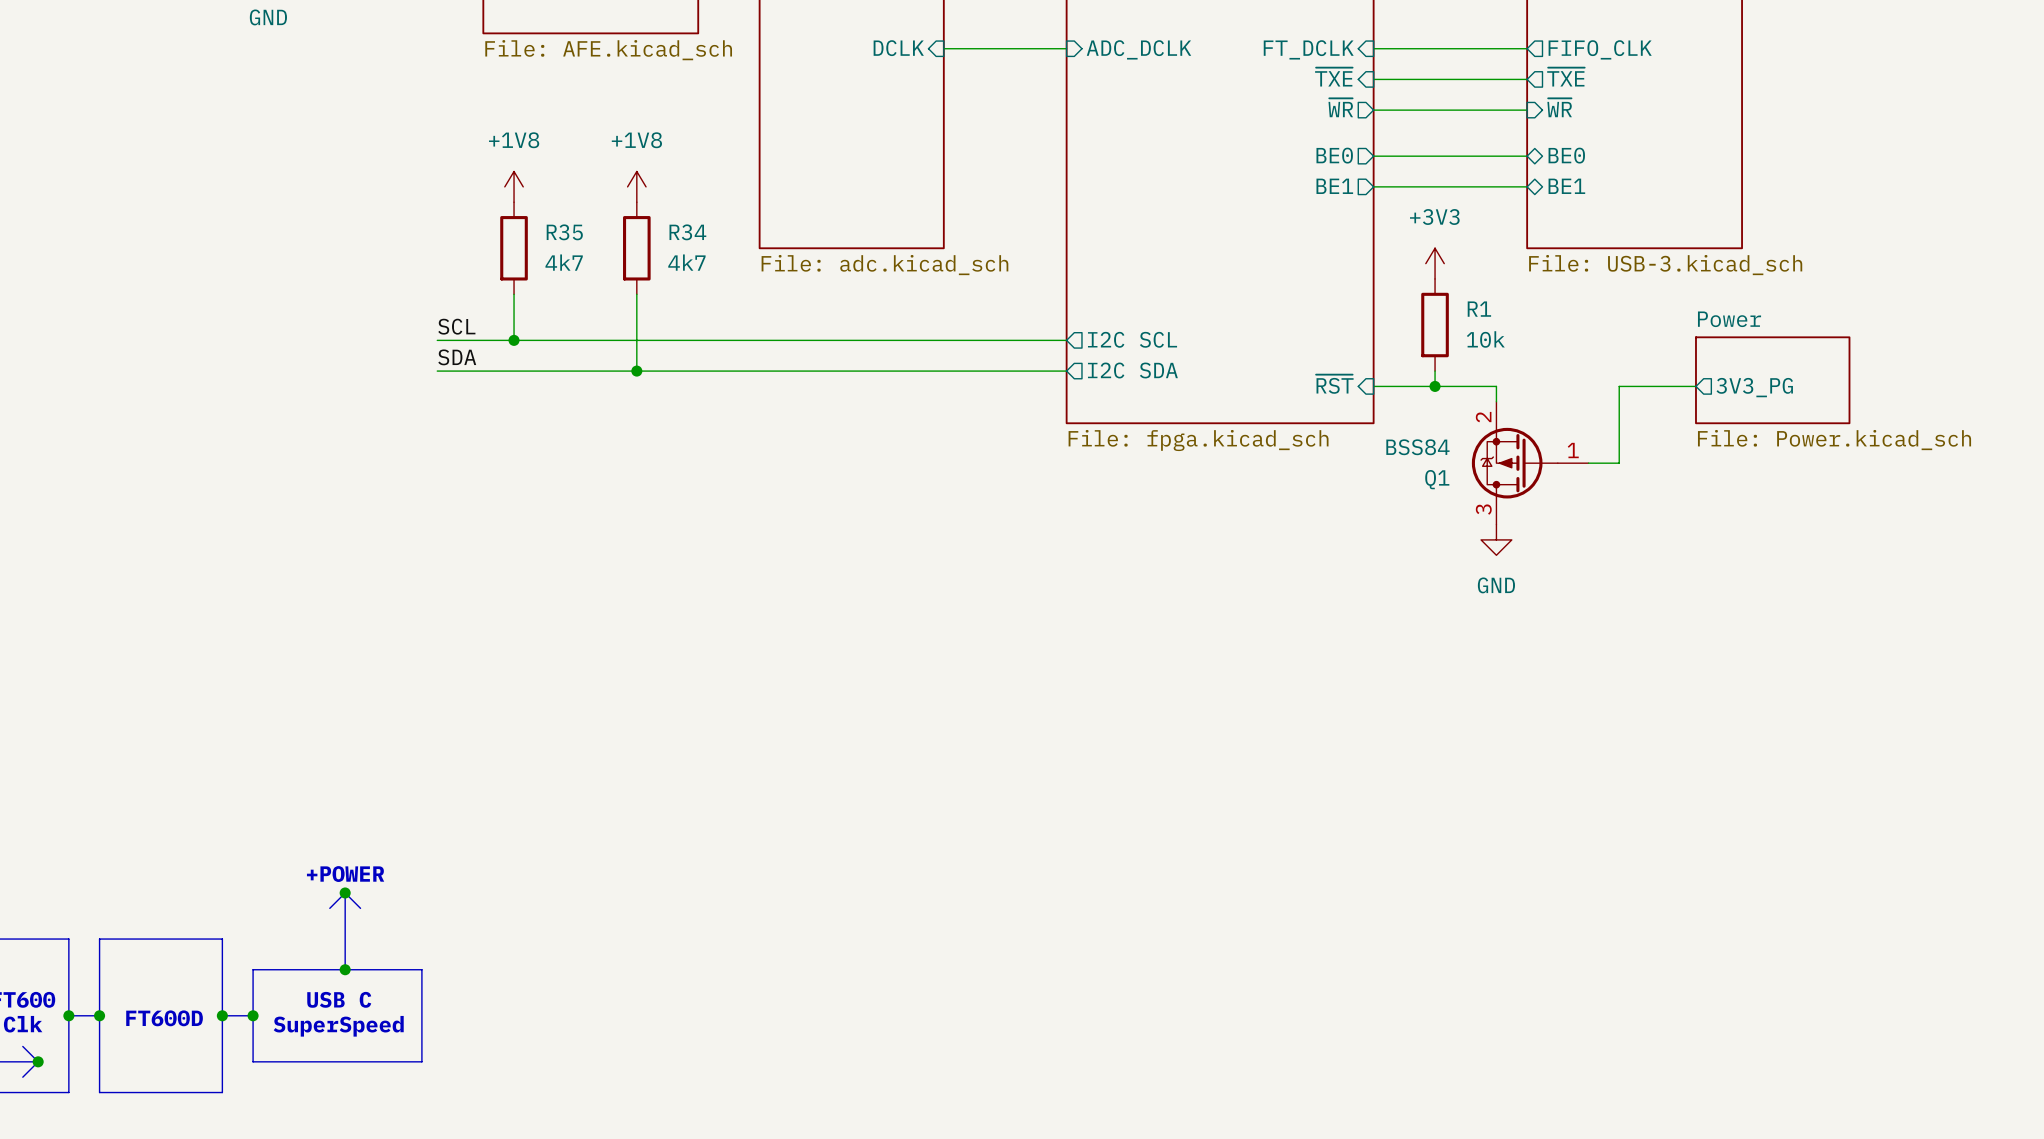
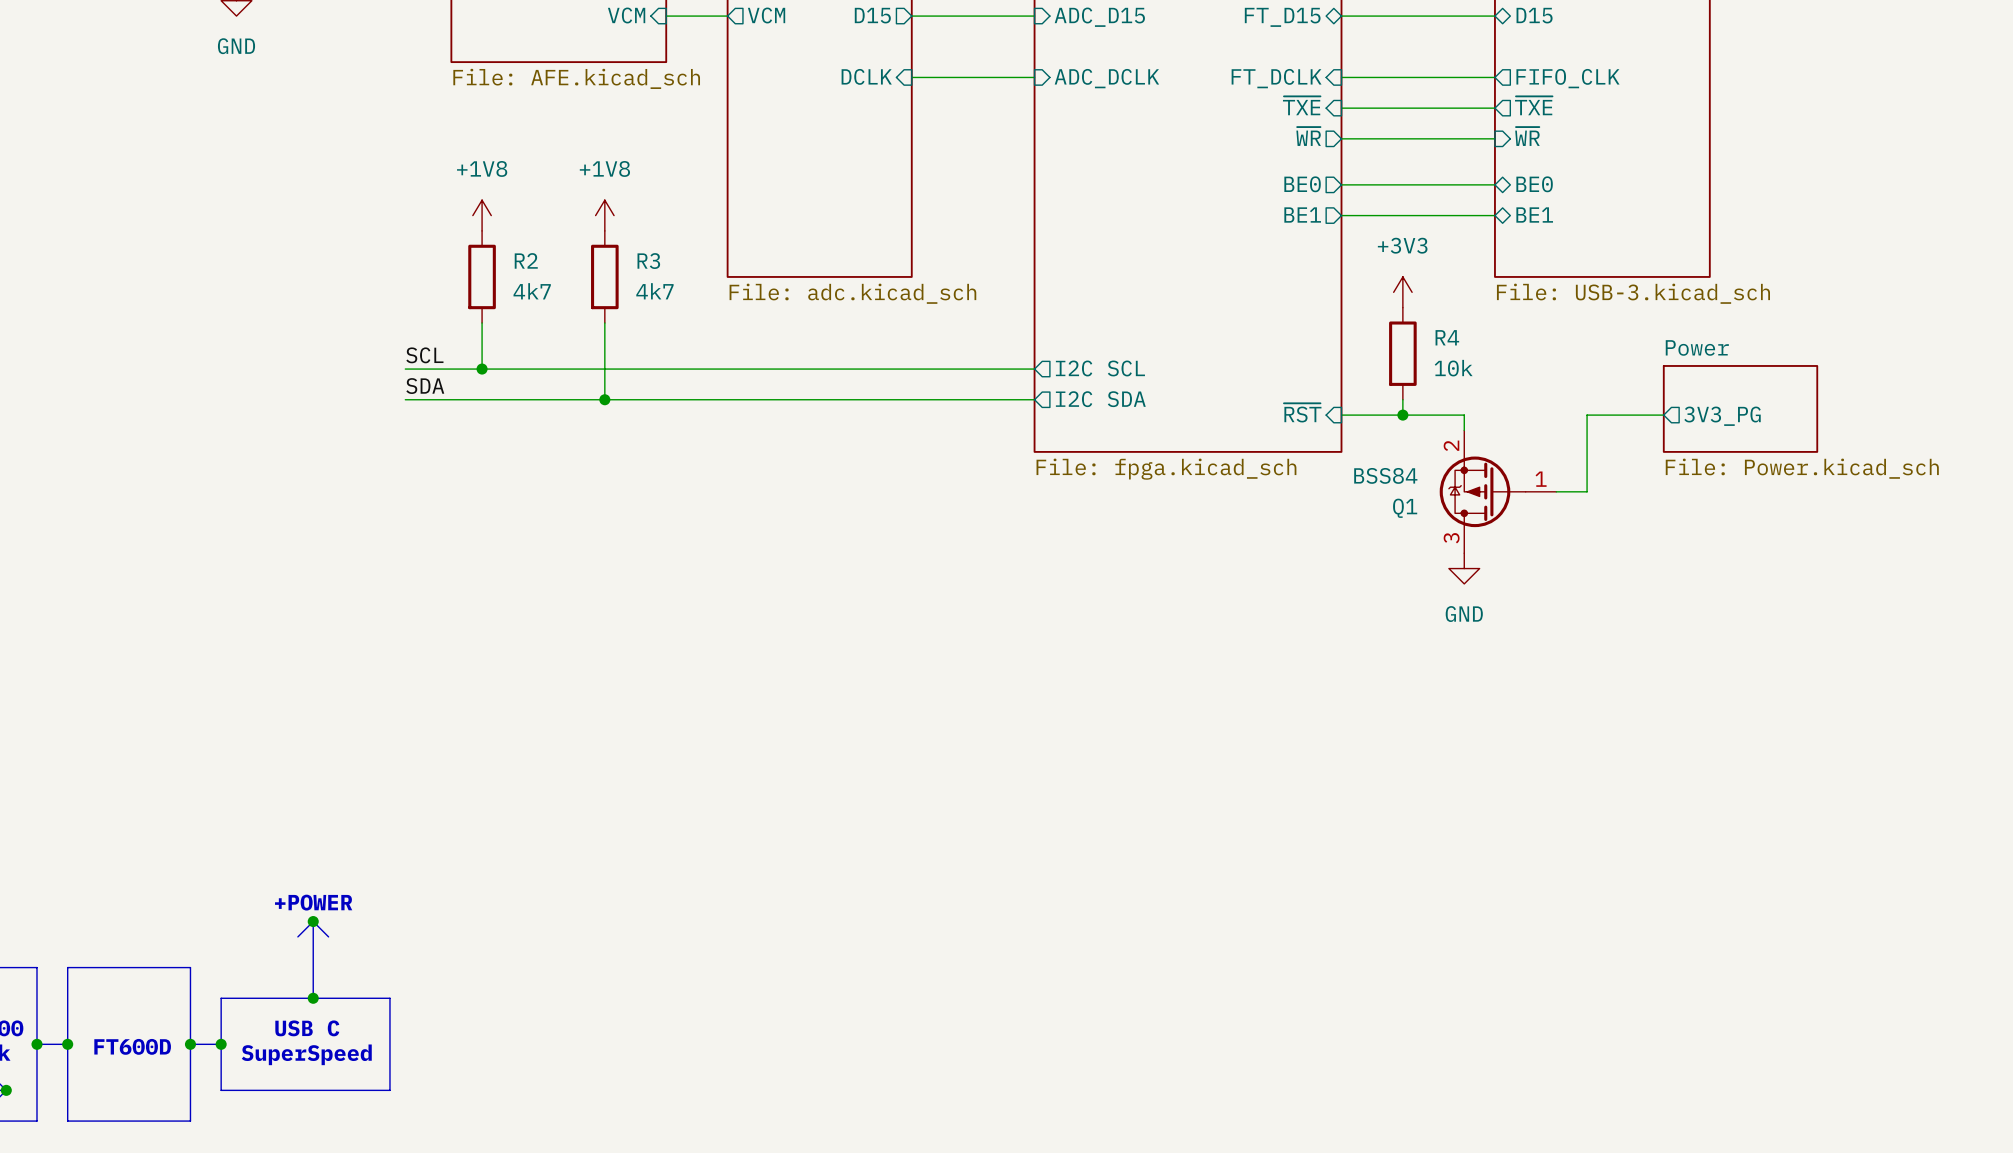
R35 name: R35 (564, 232) -> R2 (526, 260)
R34 name: R34 (687, 232) -> R3 (648, 261)
R1 name: R1 (1479, 309) -> R4 (1447, 337)

